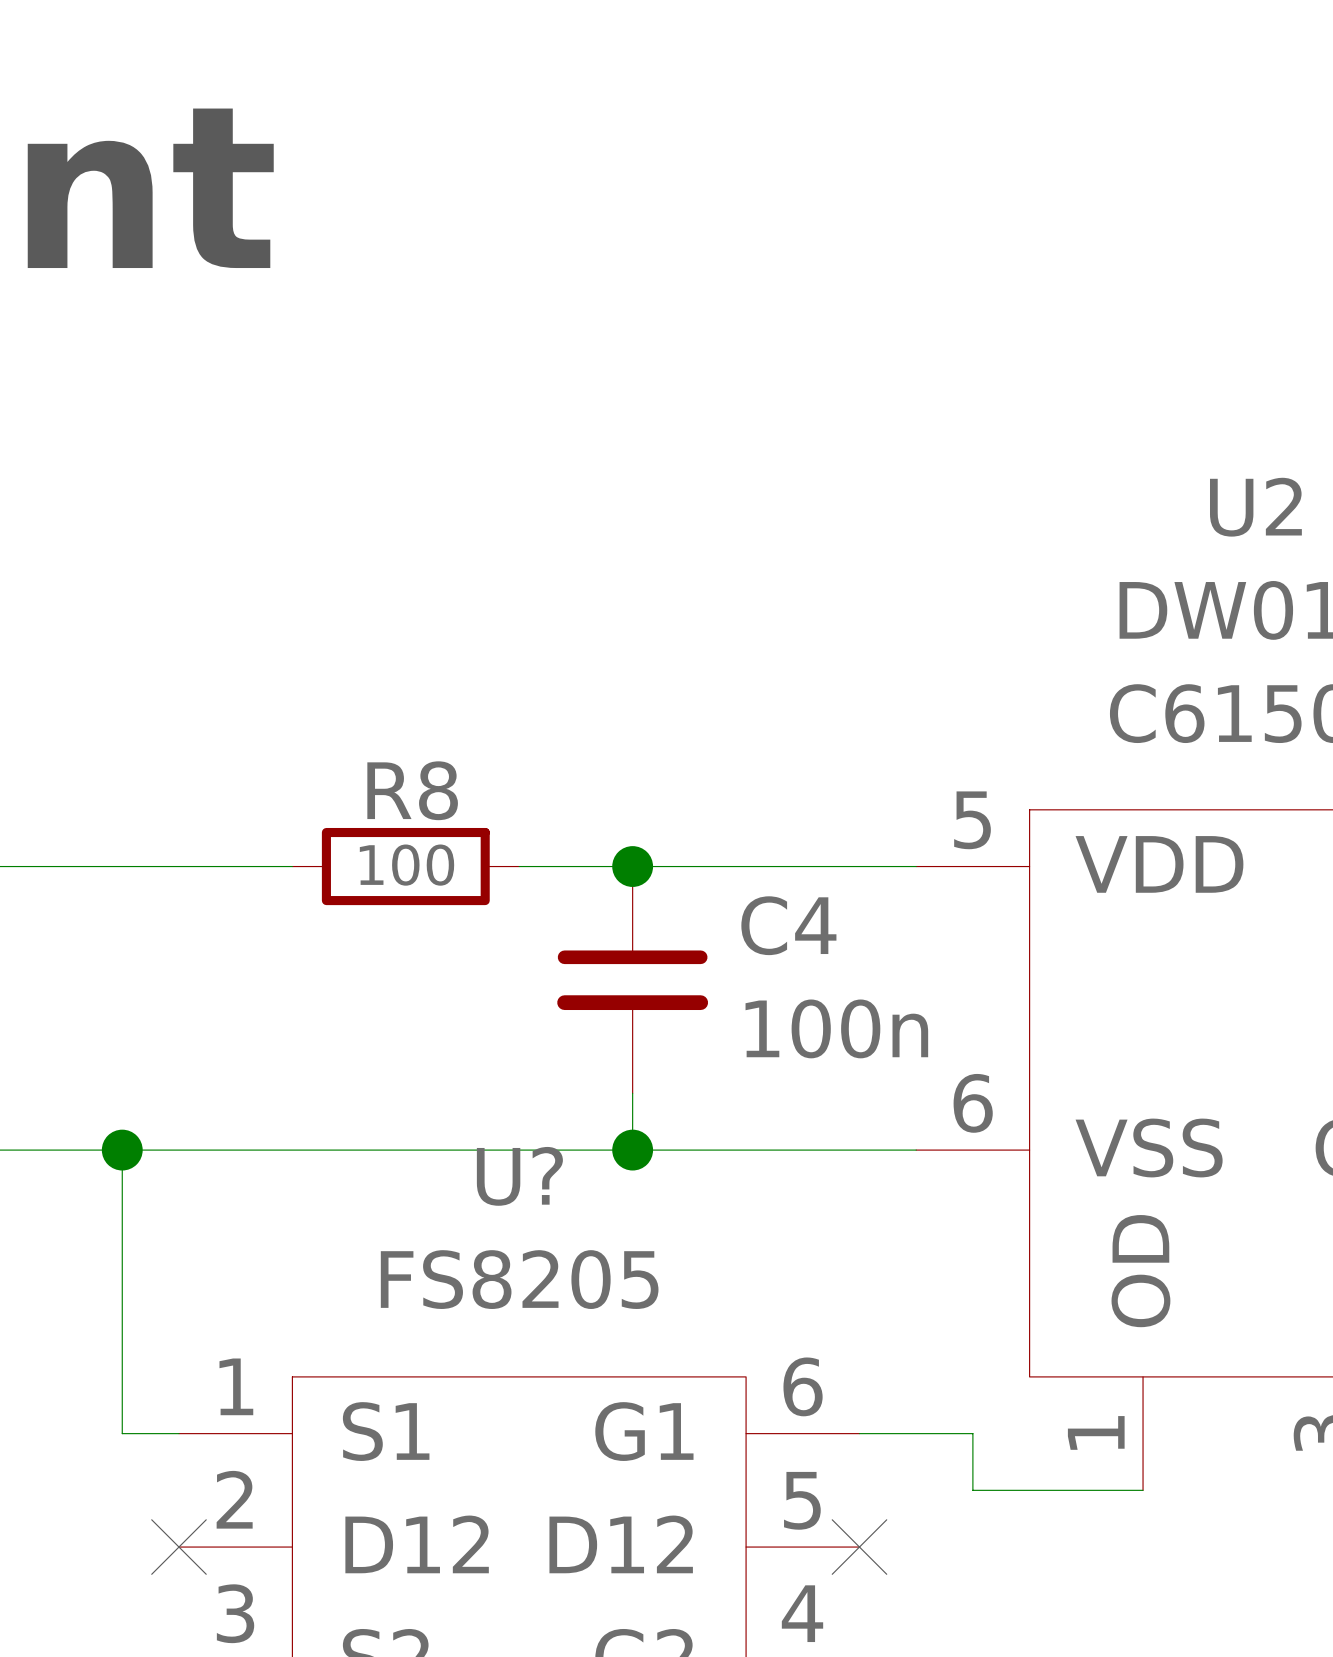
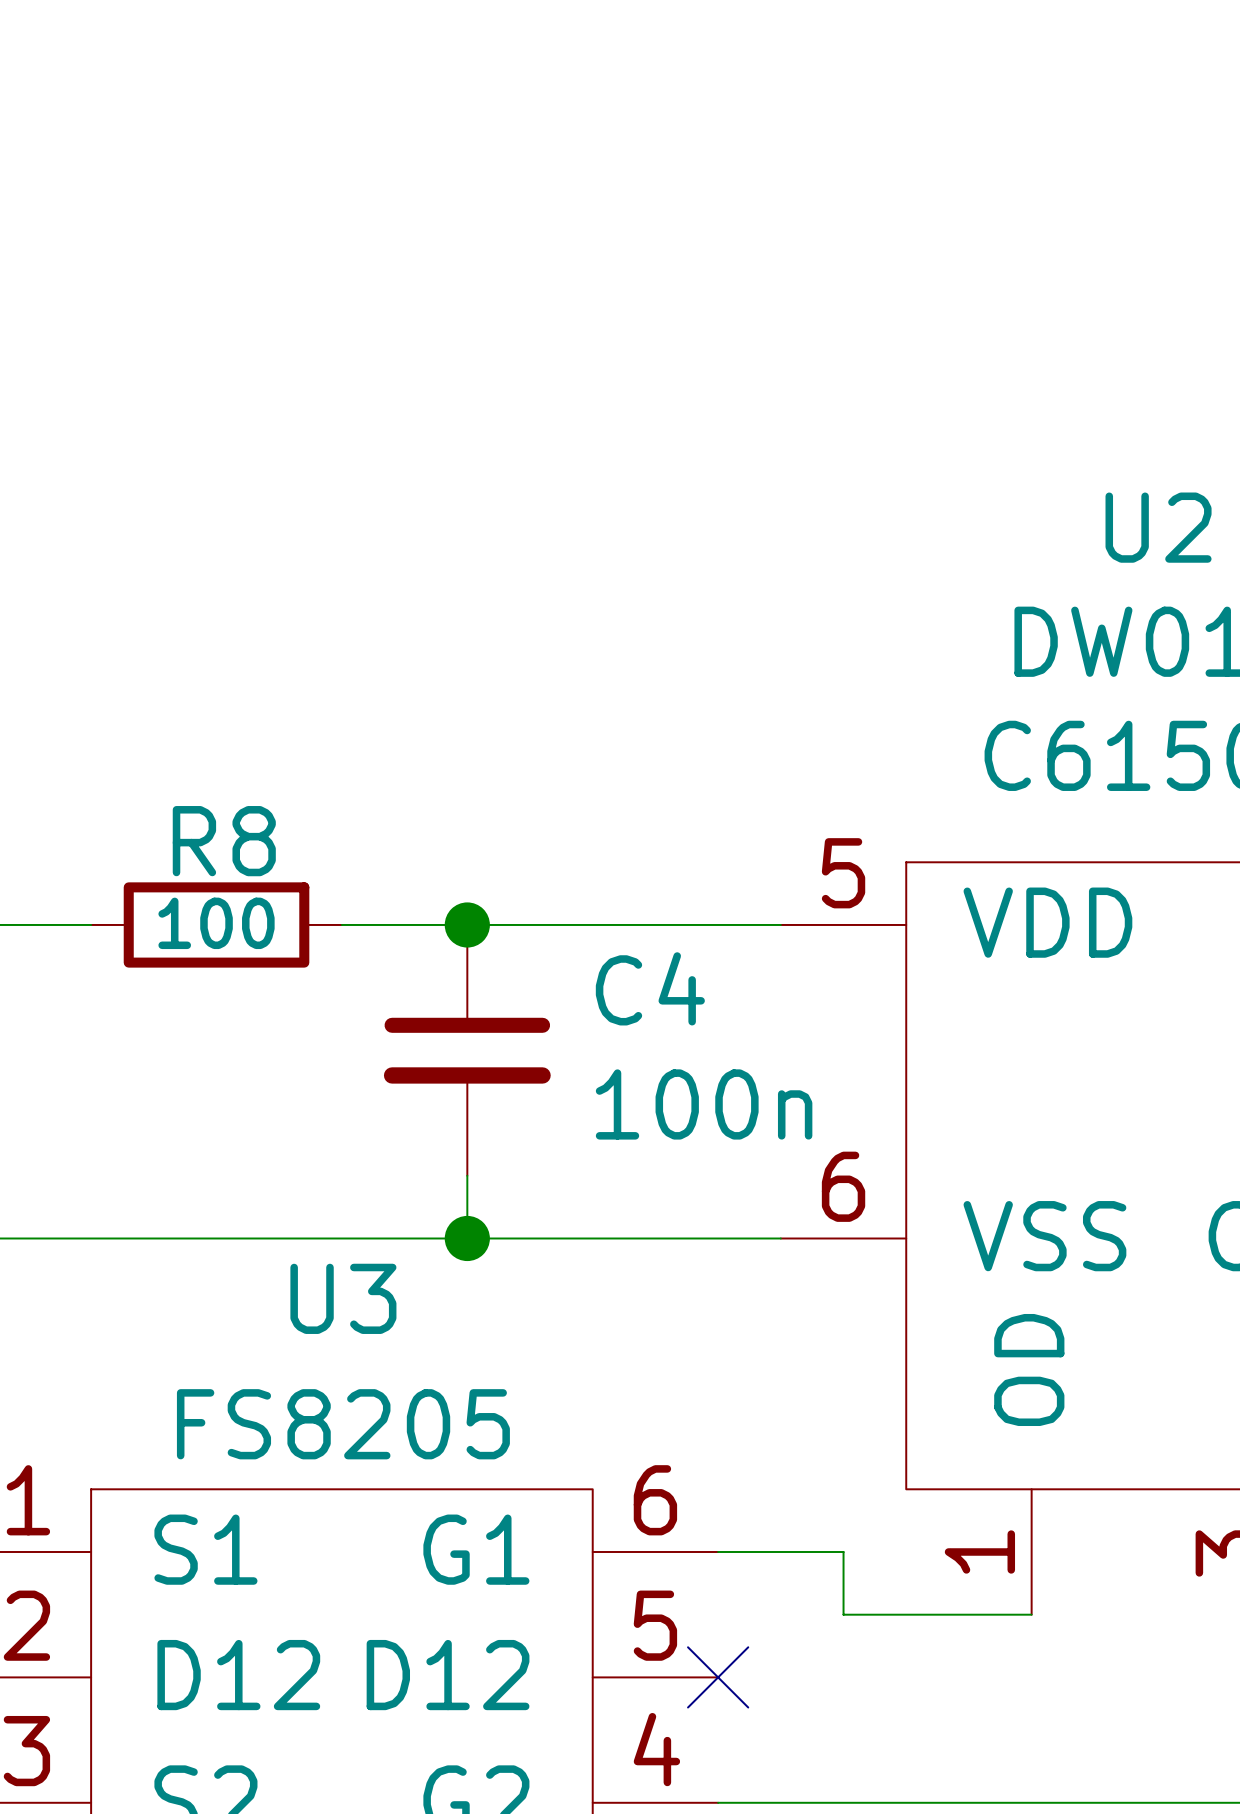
U? name: U? (519, 1176) -> U3 (343, 1298)
U? value position: FS8205 (519, 1279) -> FS8205 (343, 1424)

